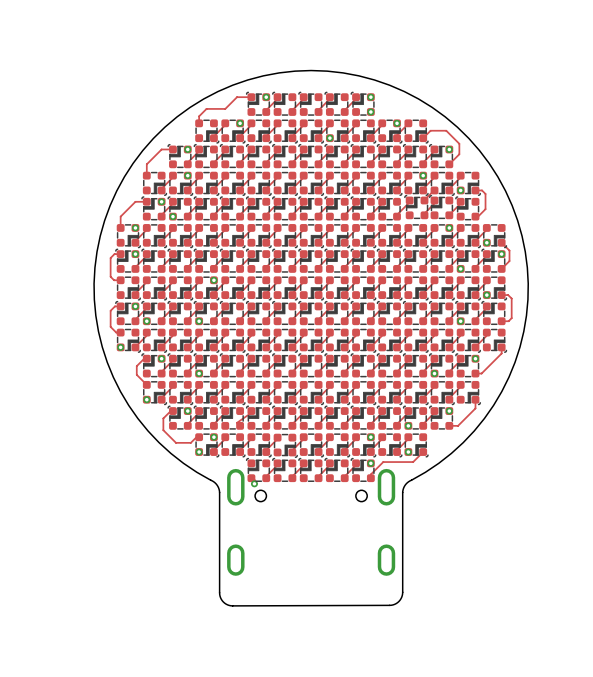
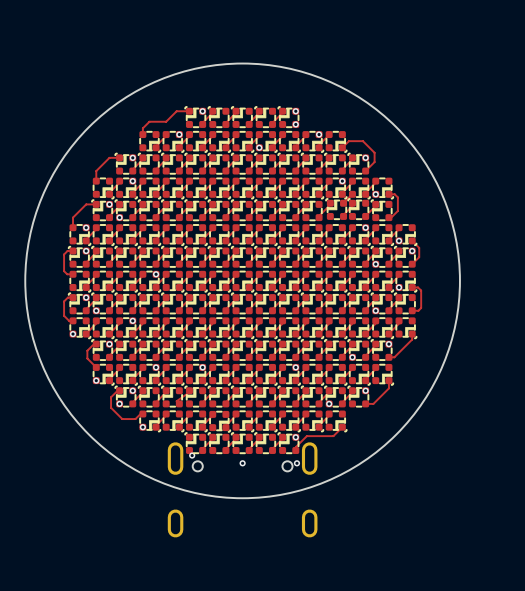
round board edge: none -> [24, 63, 461, 499]
via position: (199, 321) -> (132, 320)
via: (199, 373) -> none
via: none -> (156, 367)
via: none -> (202, 367)
via: none -> (295, 367)
via: none -> (119, 403)
via: (213, 437) -> none
via: (370, 437) -> none
via: (408, 452) -> none
board edge: (210, 480) (170, 453) (148, 430) (120, 391) (102, 347) (94, 299) (94, 267) (104, 220) (116, 190) (133, 163) (164, 127) (203, 98) (232, 85) (279, 72) (327, 71) (374, 79) (404, 91) (432, 107) (457, 127) (479, 150) (497, 176) (517, 220) (525, 251) (528, 283) (526, 315) (519, 347) (508, 377) (493, 405) (463, 442) (438, 463) (408, 481) (403, 487) (402, 592) (400, 598) (396, 603) (389, 605) (232, 605) (226, 604) (221, 599) (219, 592) (219, 490) (217, 485) (210, 480) -> none
via: none -> (242, 463)
via: none -> (296, 463)

